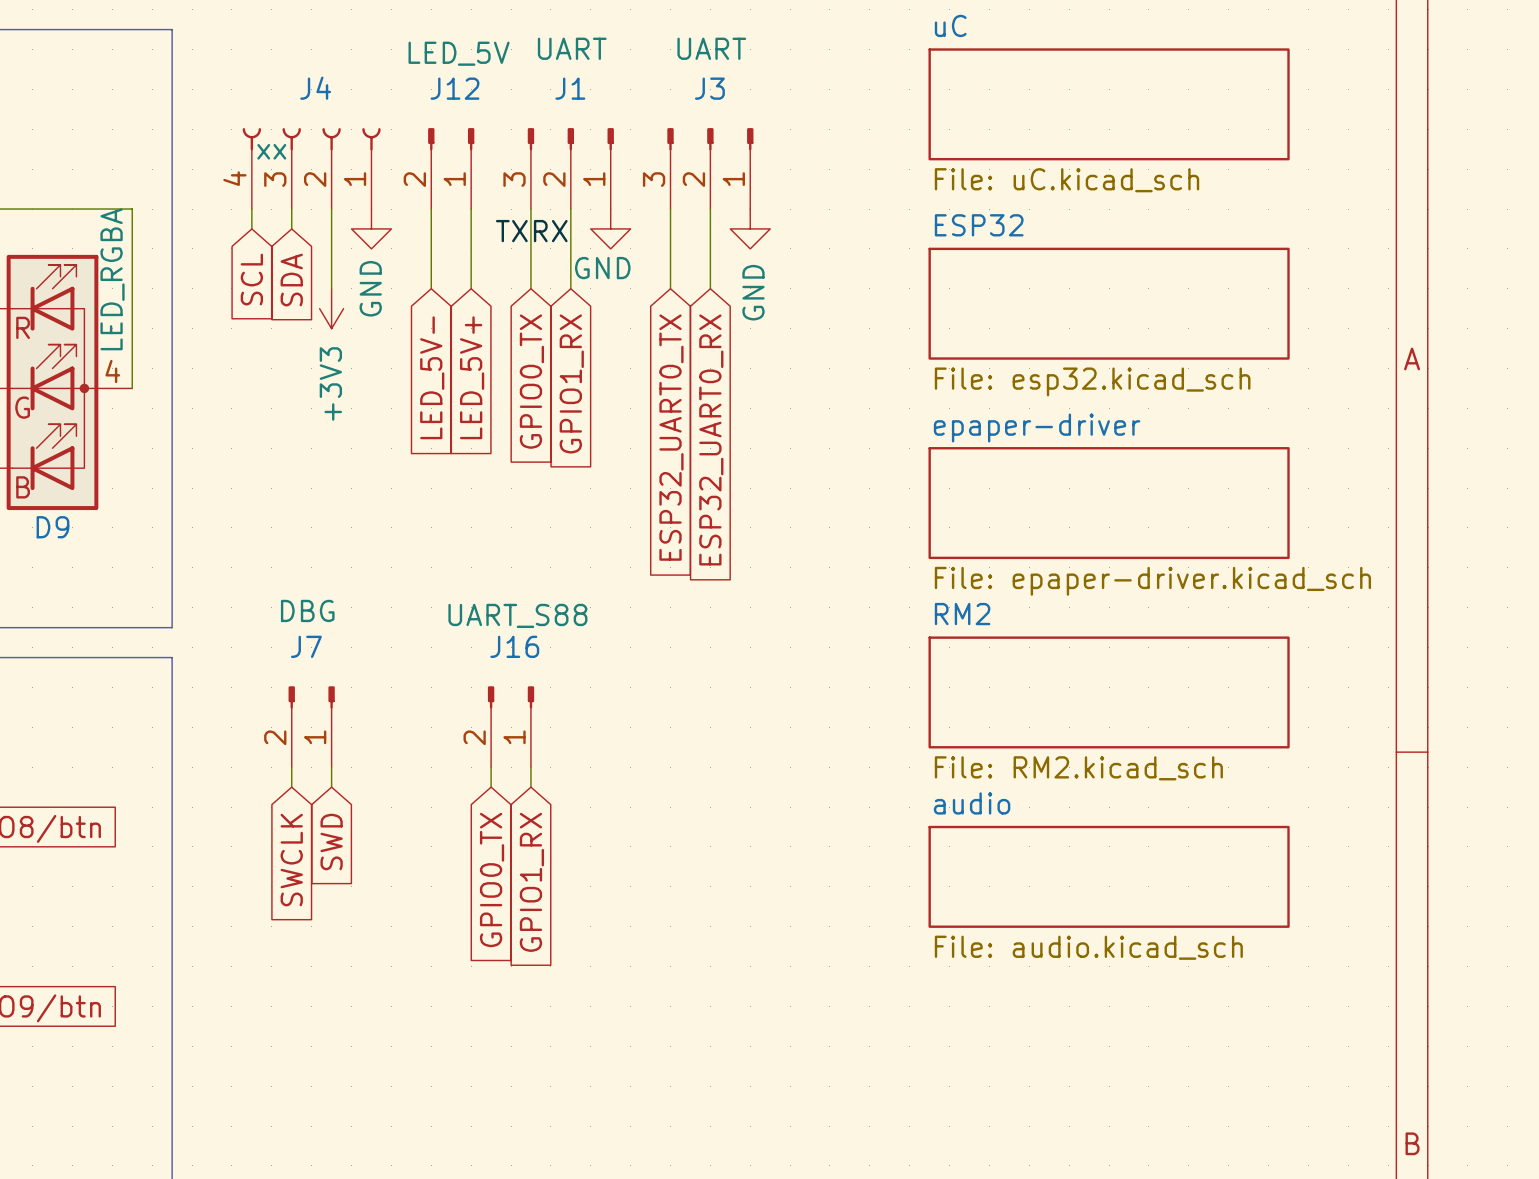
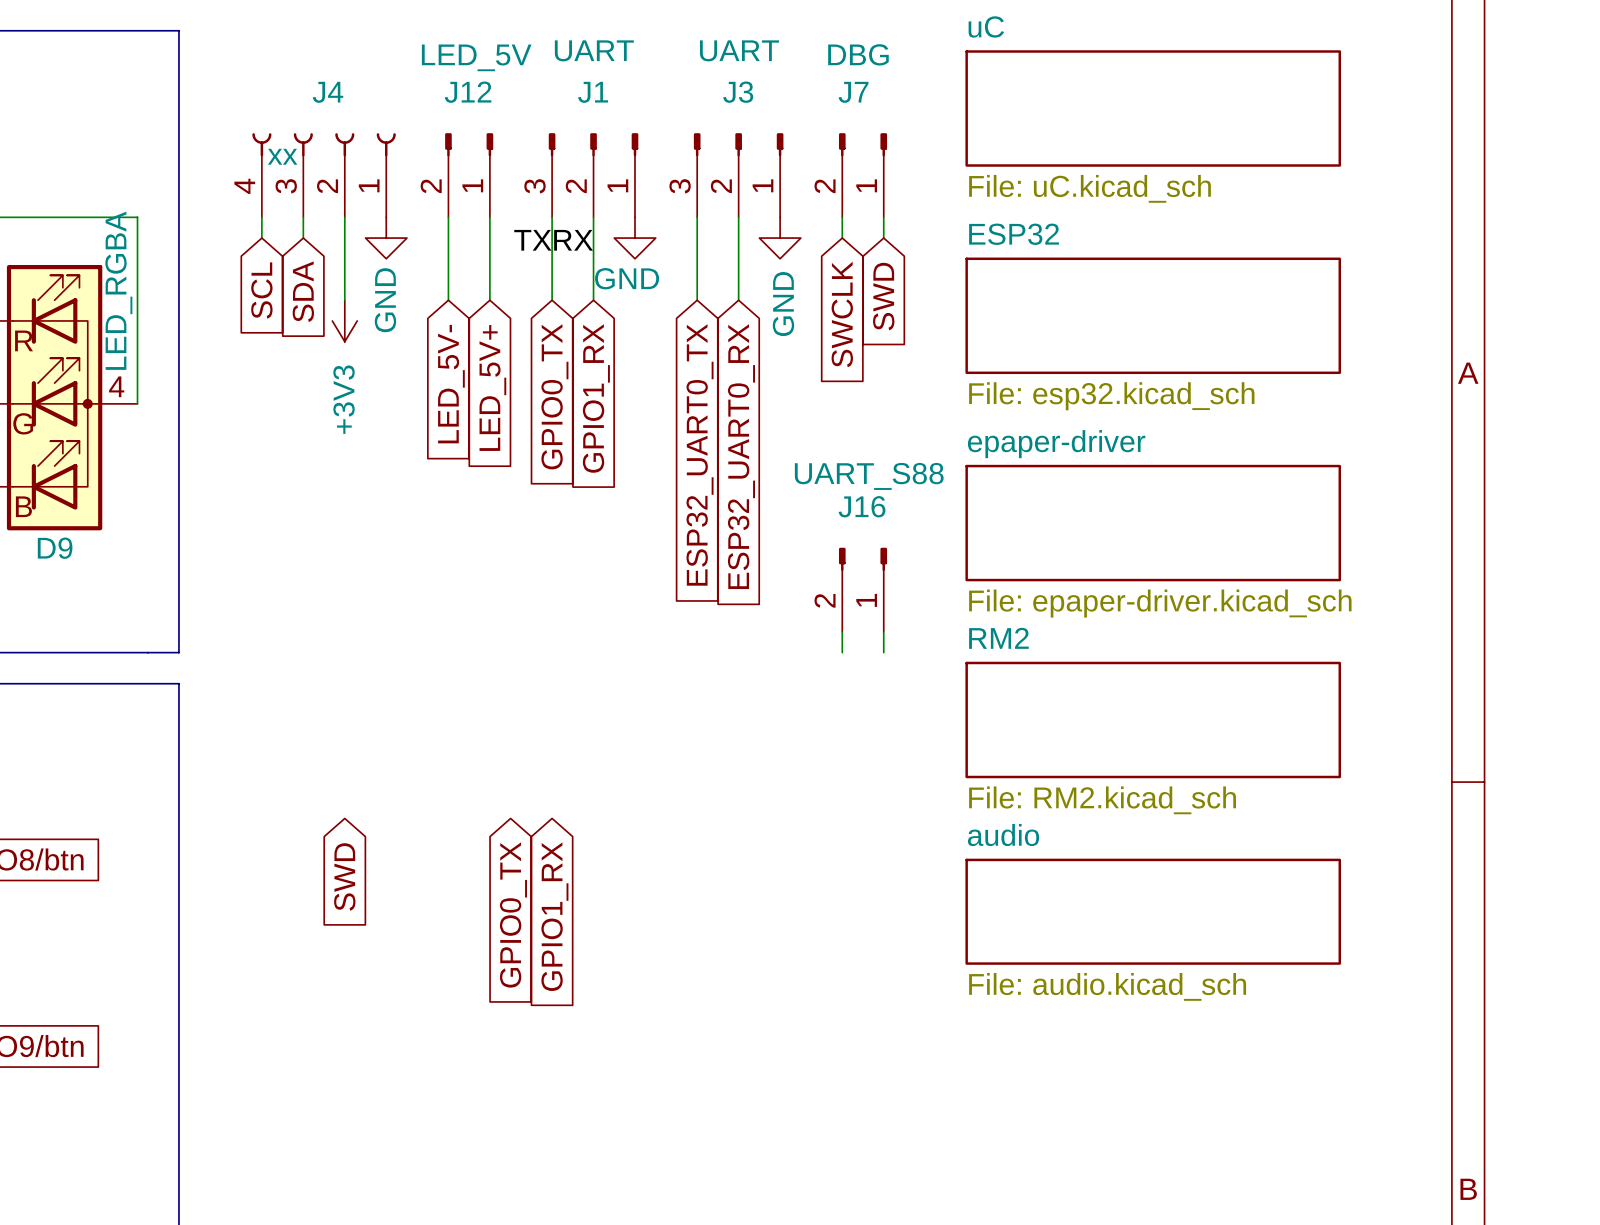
wire: none -> (842, 217) (842, 238)
wire: none -> (883, 217) (883, 238)
global label: none -> SWD (883, 296)
global label: none -> SWCLK (842, 314)
J7 position: (311, 726) -> (863, 175)
J16 position: (511, 726) -> (863, 589)
wire: (291, 767) (291, 787) -> none
wire: (331, 767) (331, 787) -> none
wire: (491, 767) (491, 787) -> (842, 631) (842, 652)
wire: (530, 767) (530, 787) -> (883, 631) (883, 652)
global label: SWCLK (291, 860) -> none

